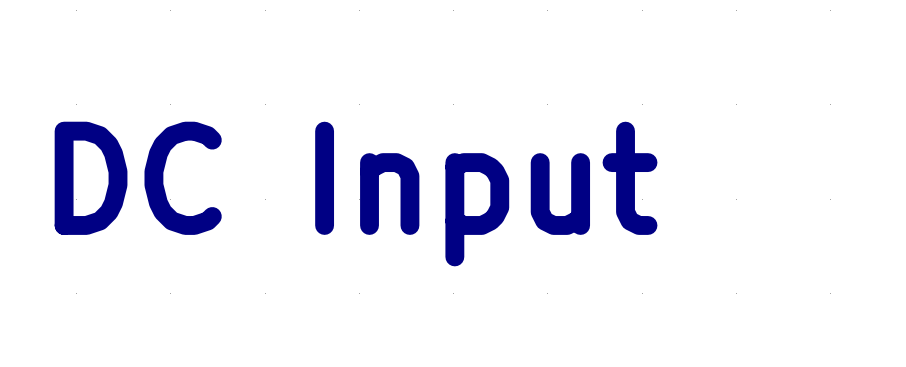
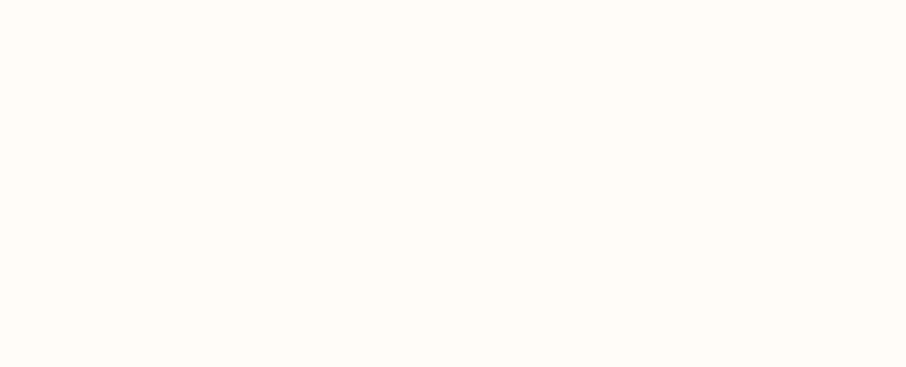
text: DC Input (356, 194) -> none

